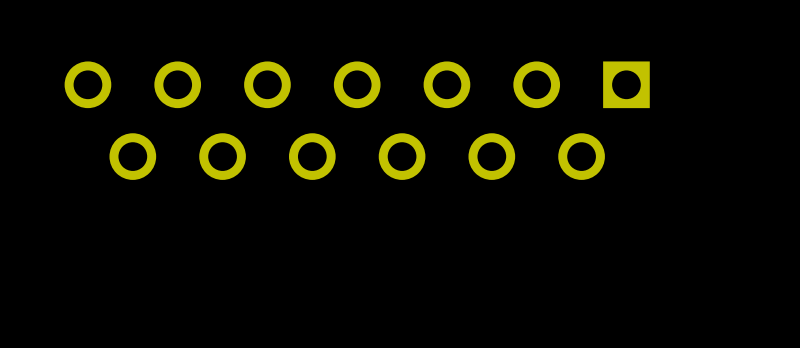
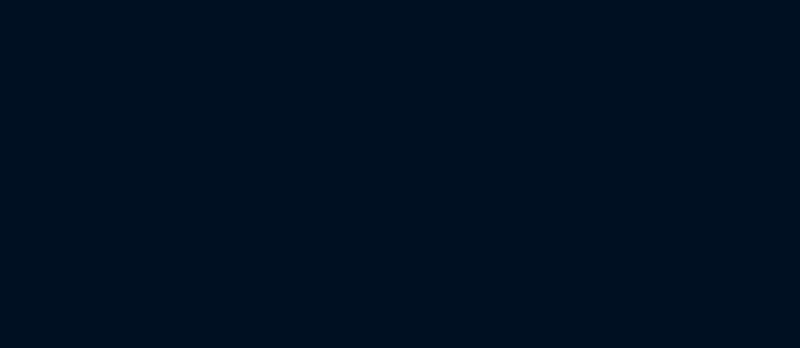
part: (357, 120) -> none

